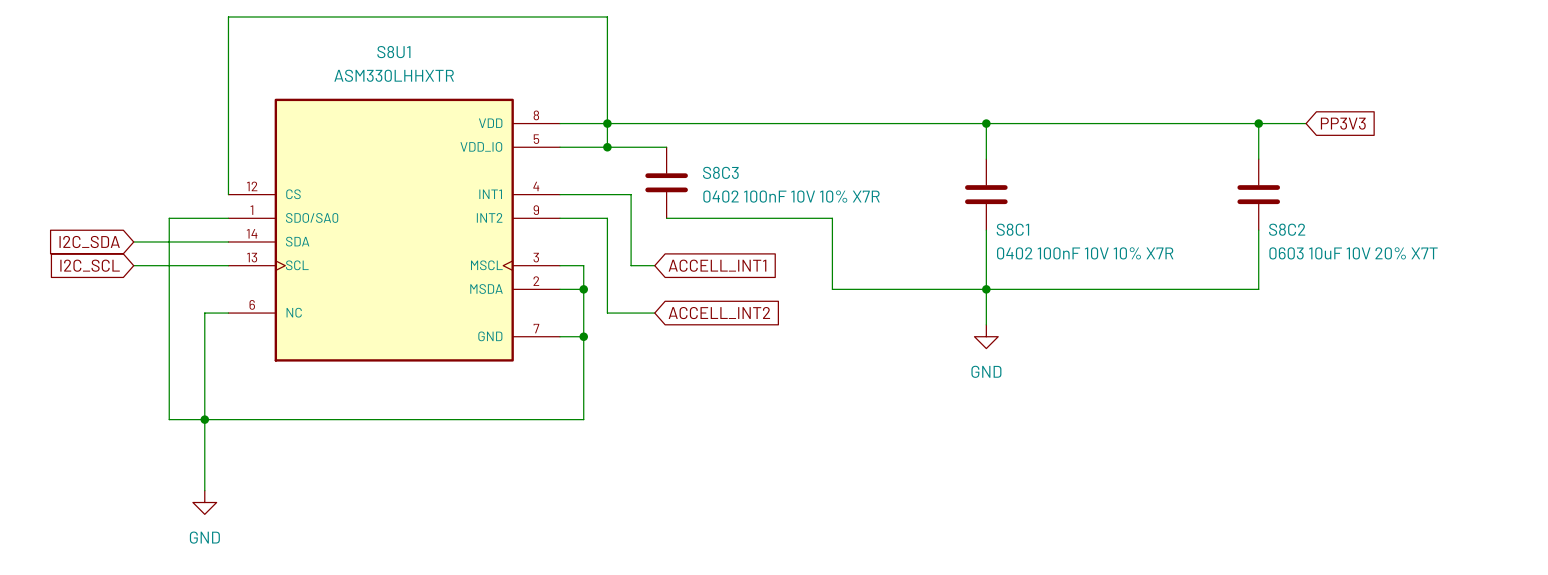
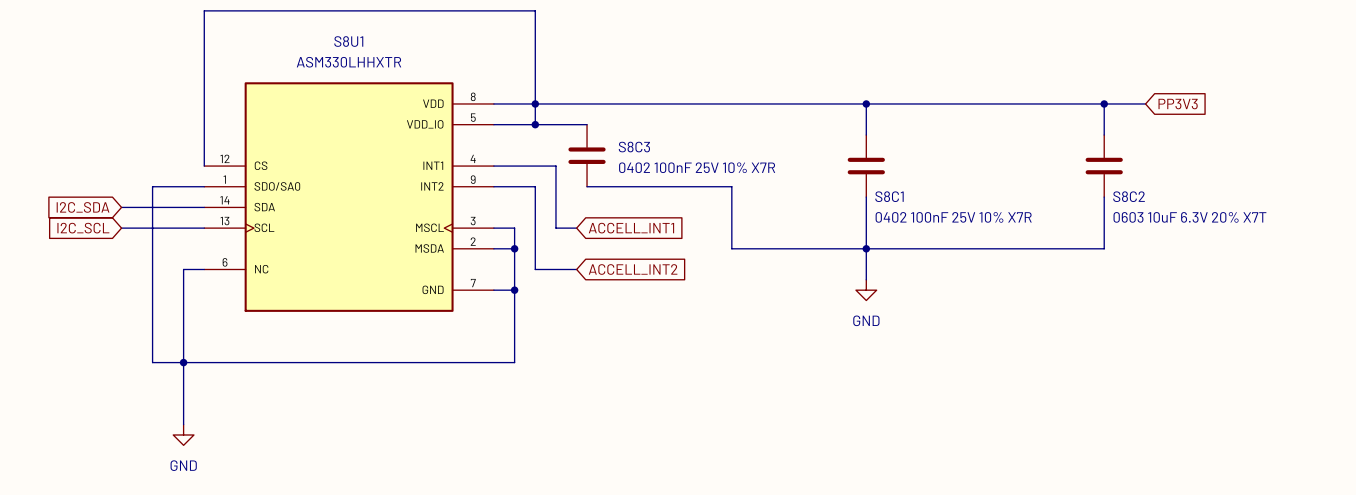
S8C3 value: 0402 100nF 10V 10% X7R (791, 196) -> 0402 100nF 25V 10% X7R (697, 167)
S8C1 value: 0402 100nF 10V 10% X7R (1085, 253) -> 0402 100nF 25V 10% X7R (953, 217)
S8C2 value: 0603 10uF 10V 20% X7T (1353, 253) -> 0603 10uF 6.3V 20% X7T (1189, 217)

